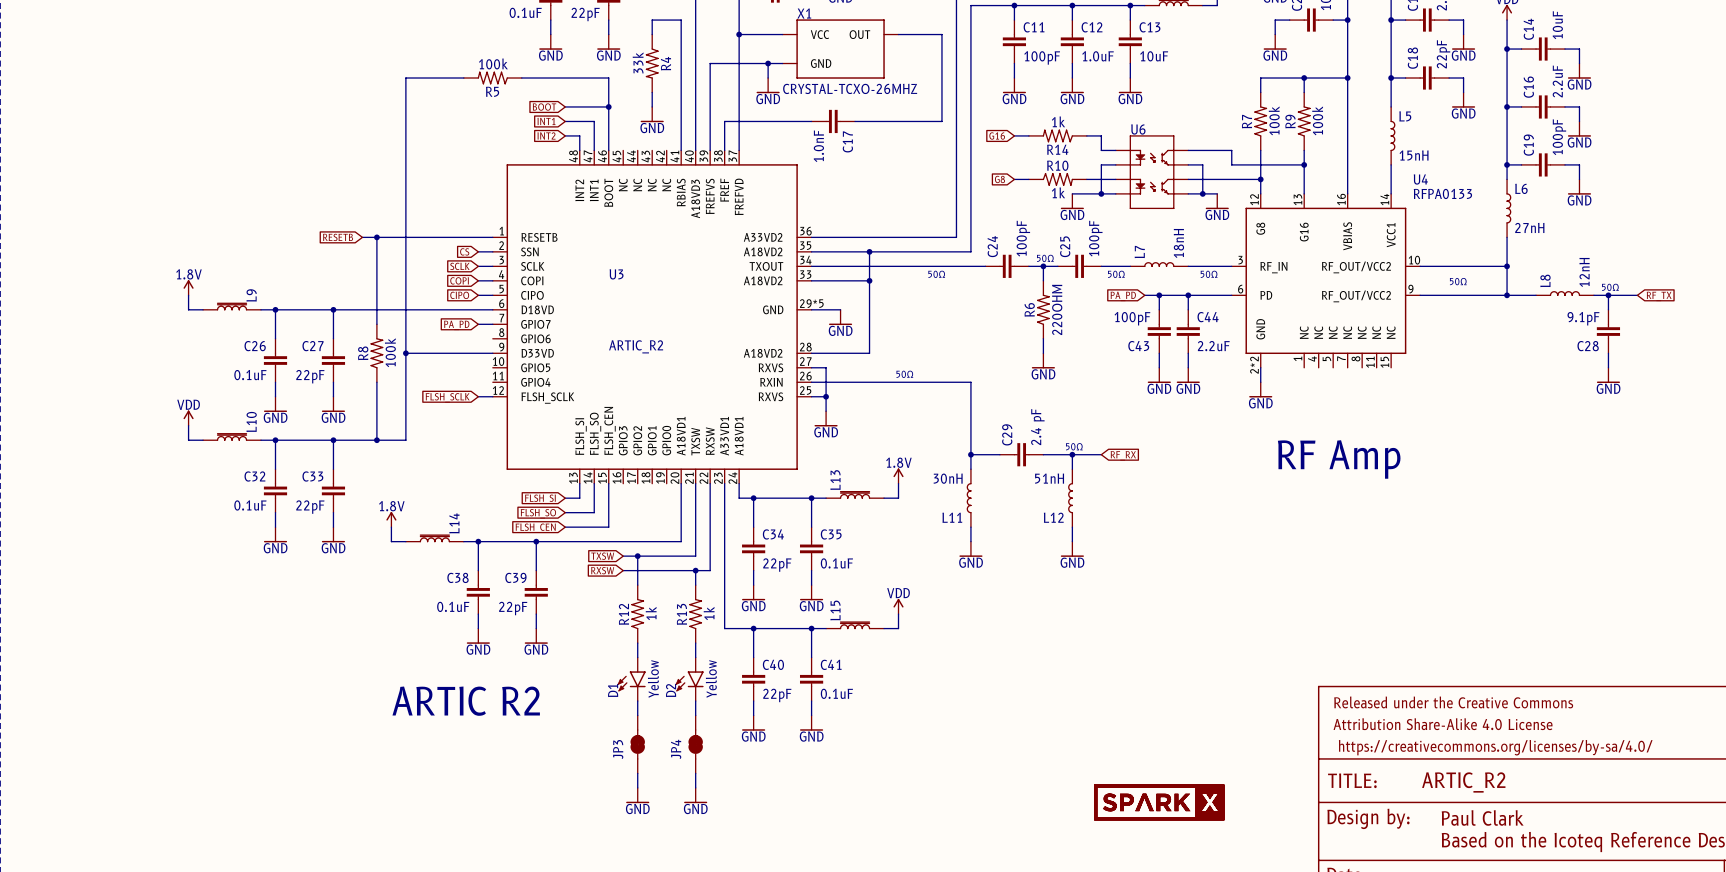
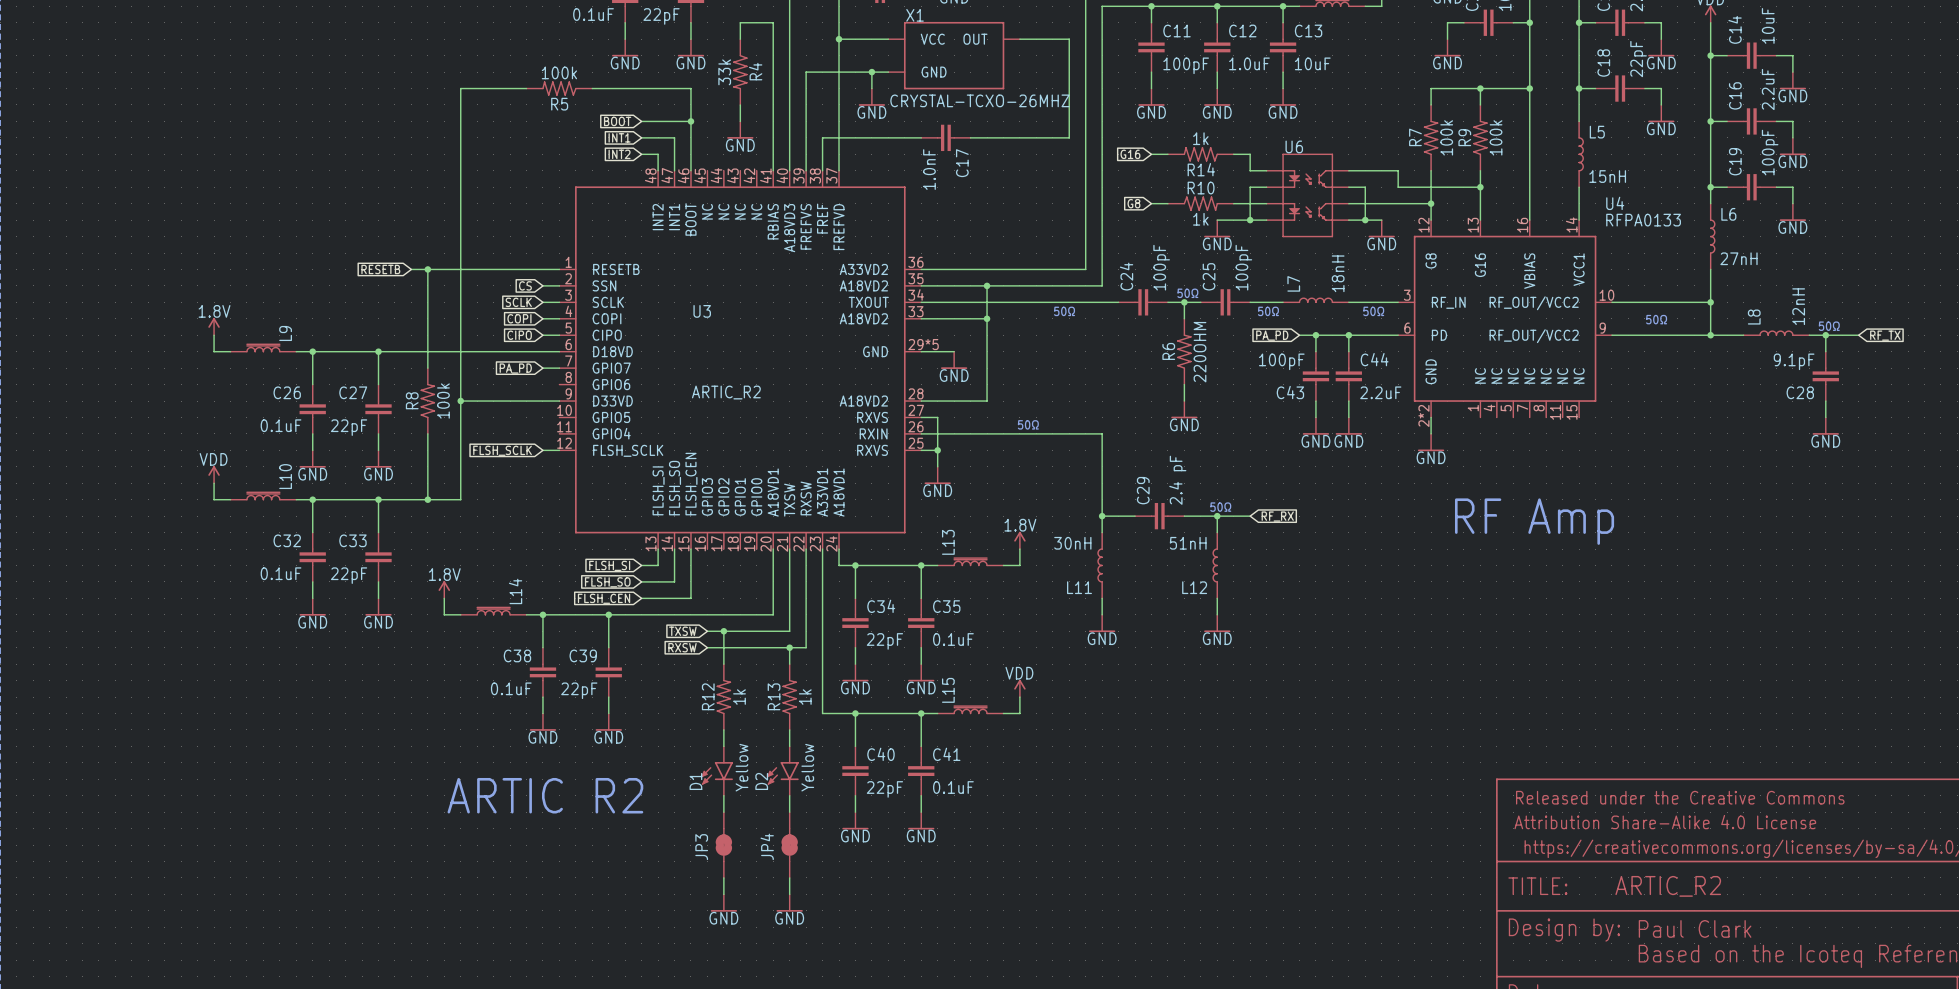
part: (1159, 802) -> none

